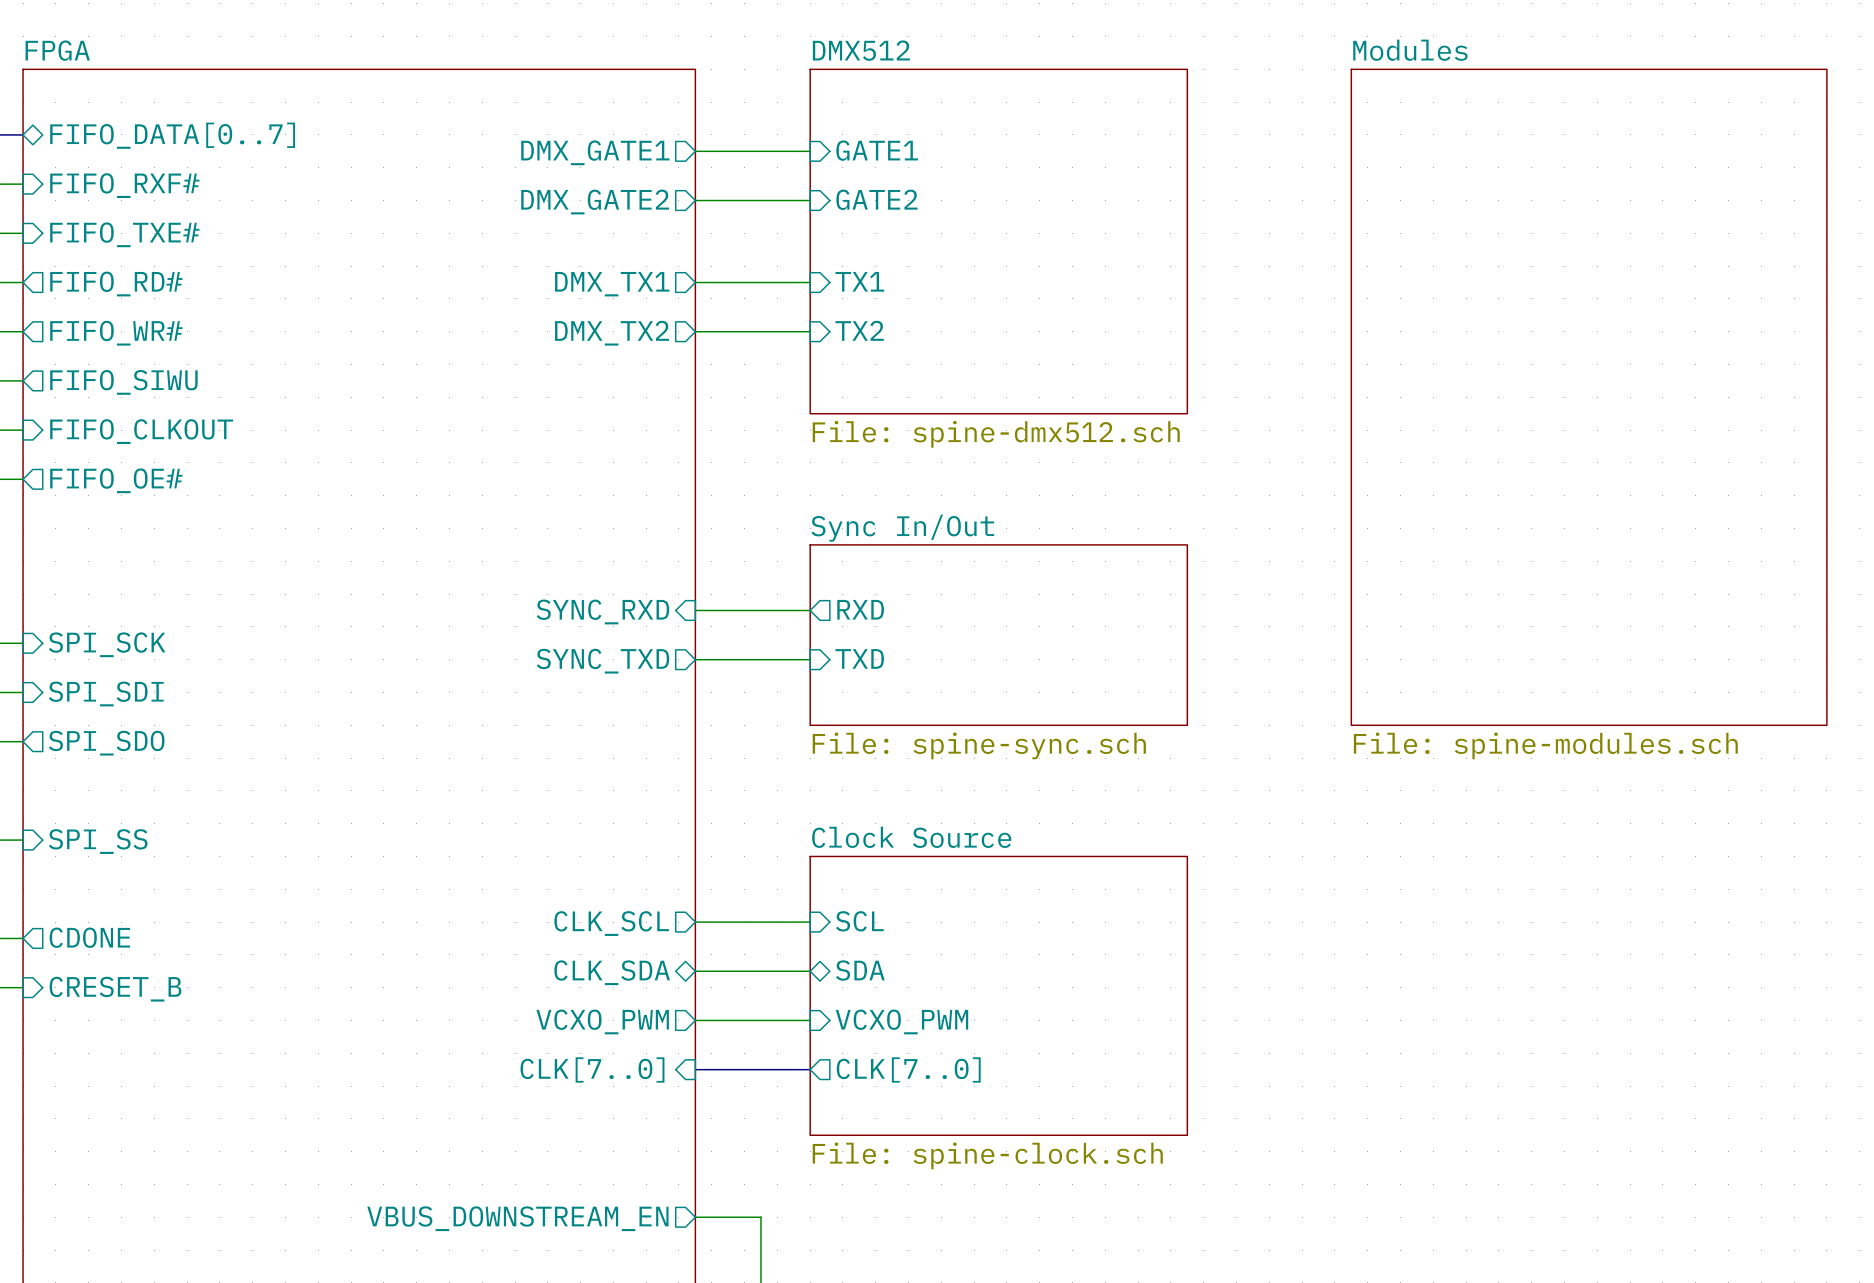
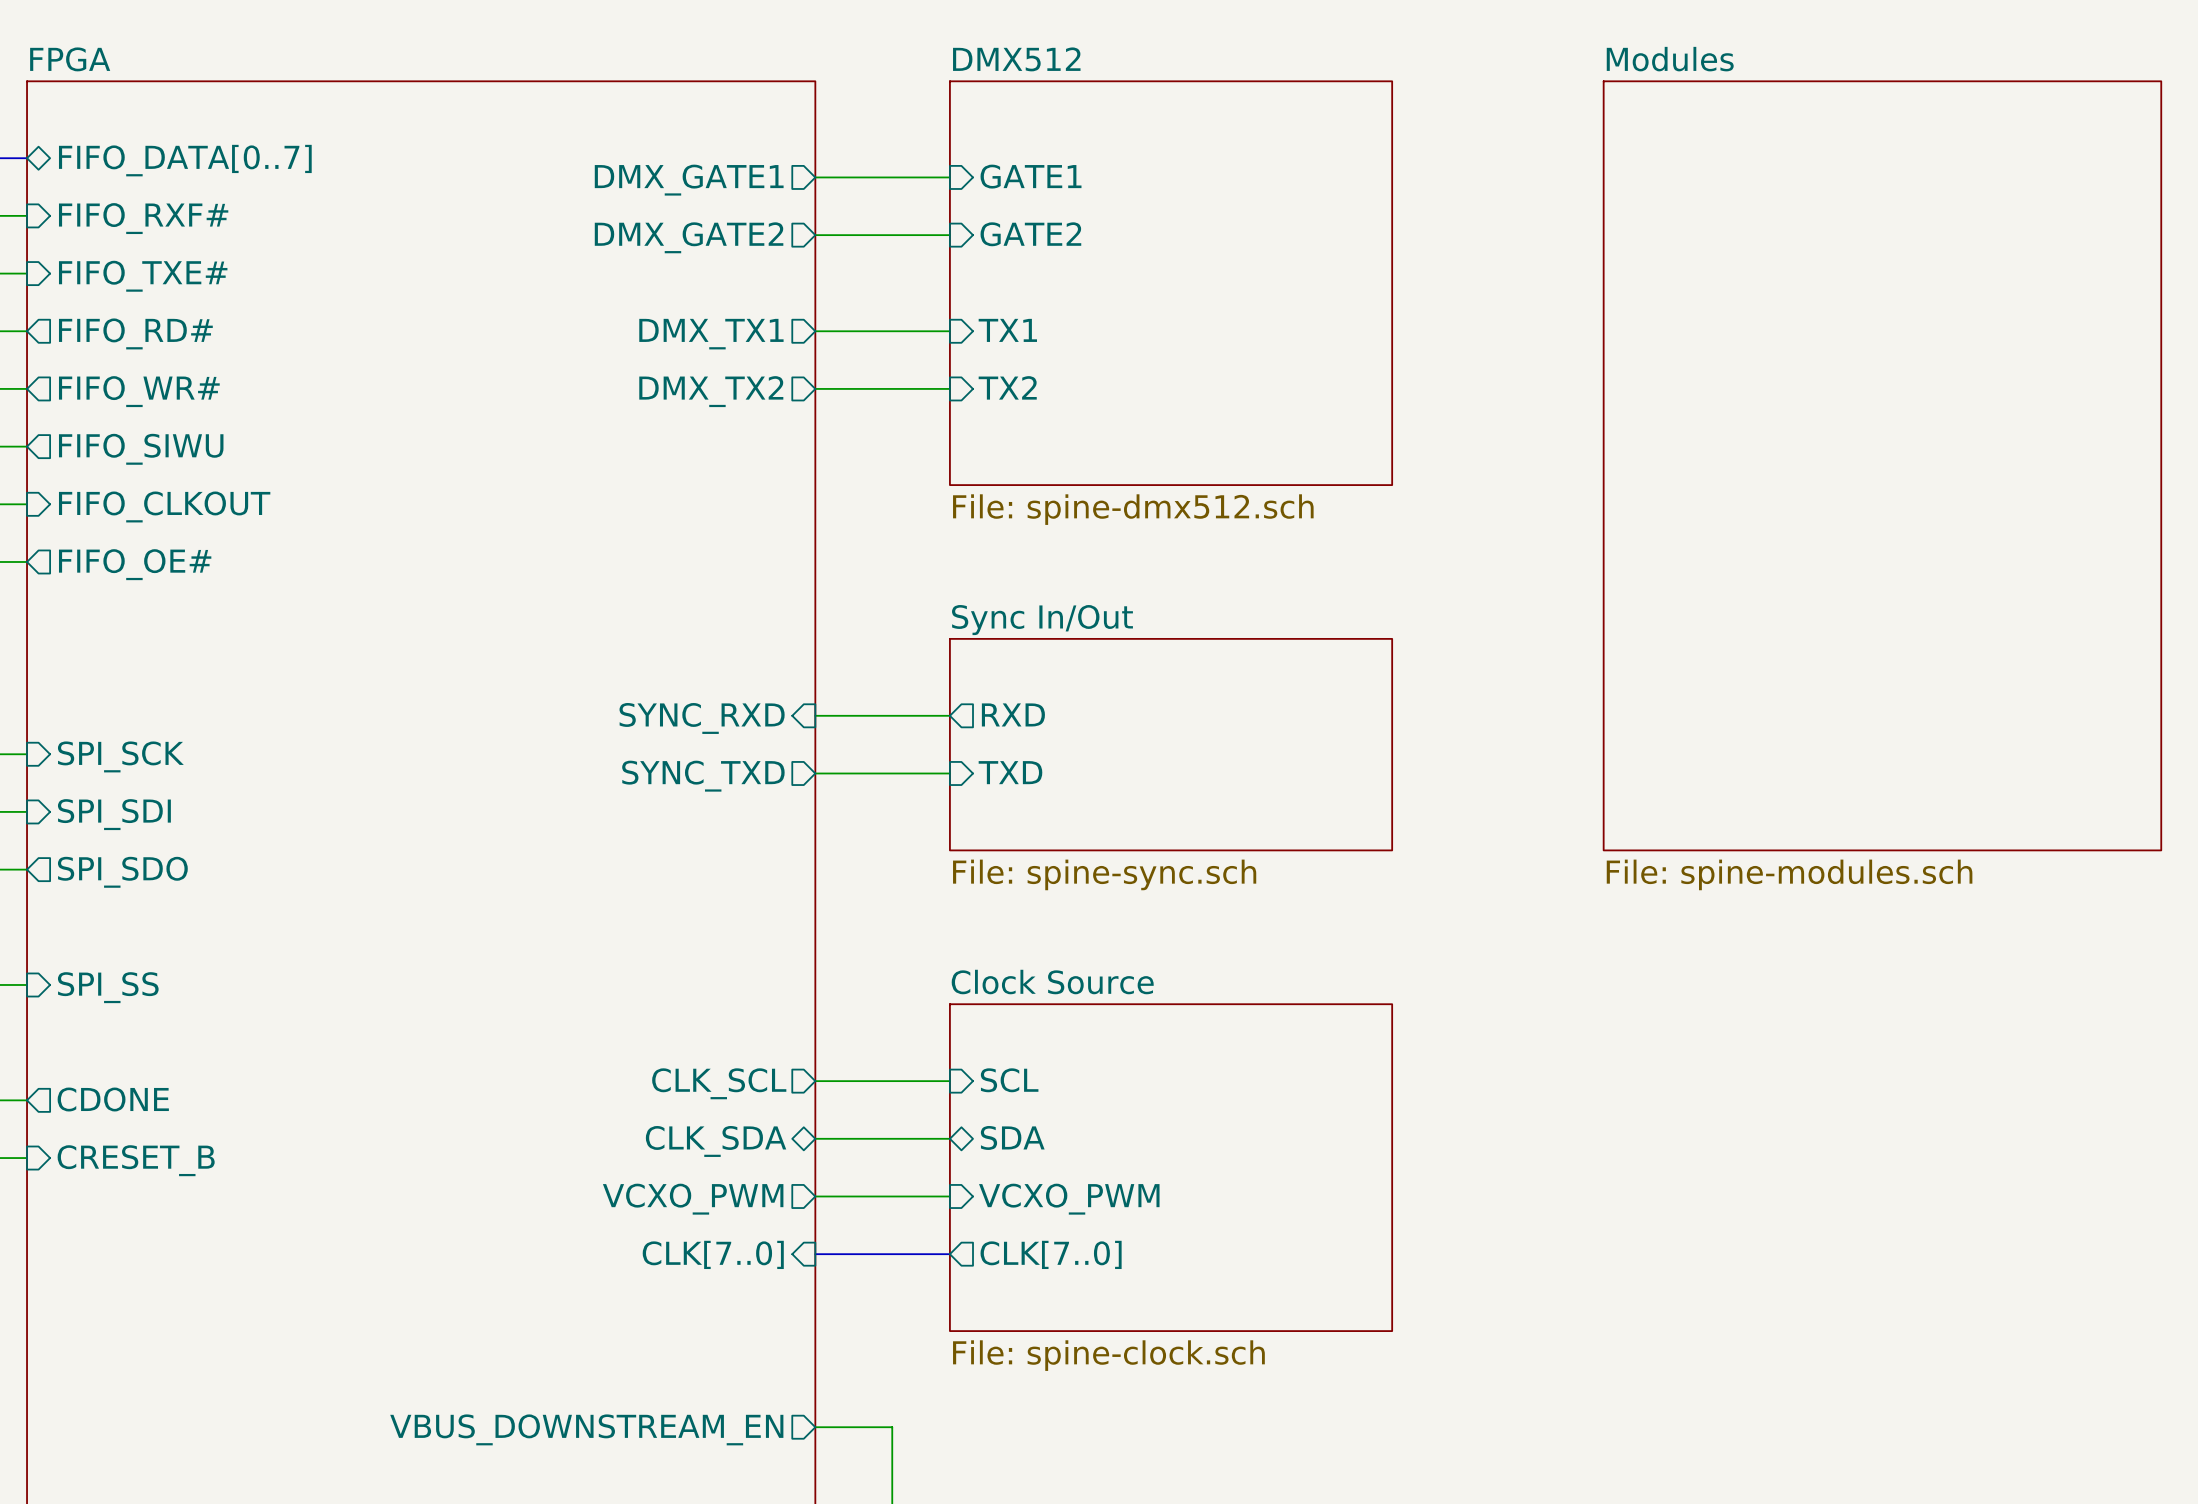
sheet Modules position: (1589, 397) -> (1882, 465)

